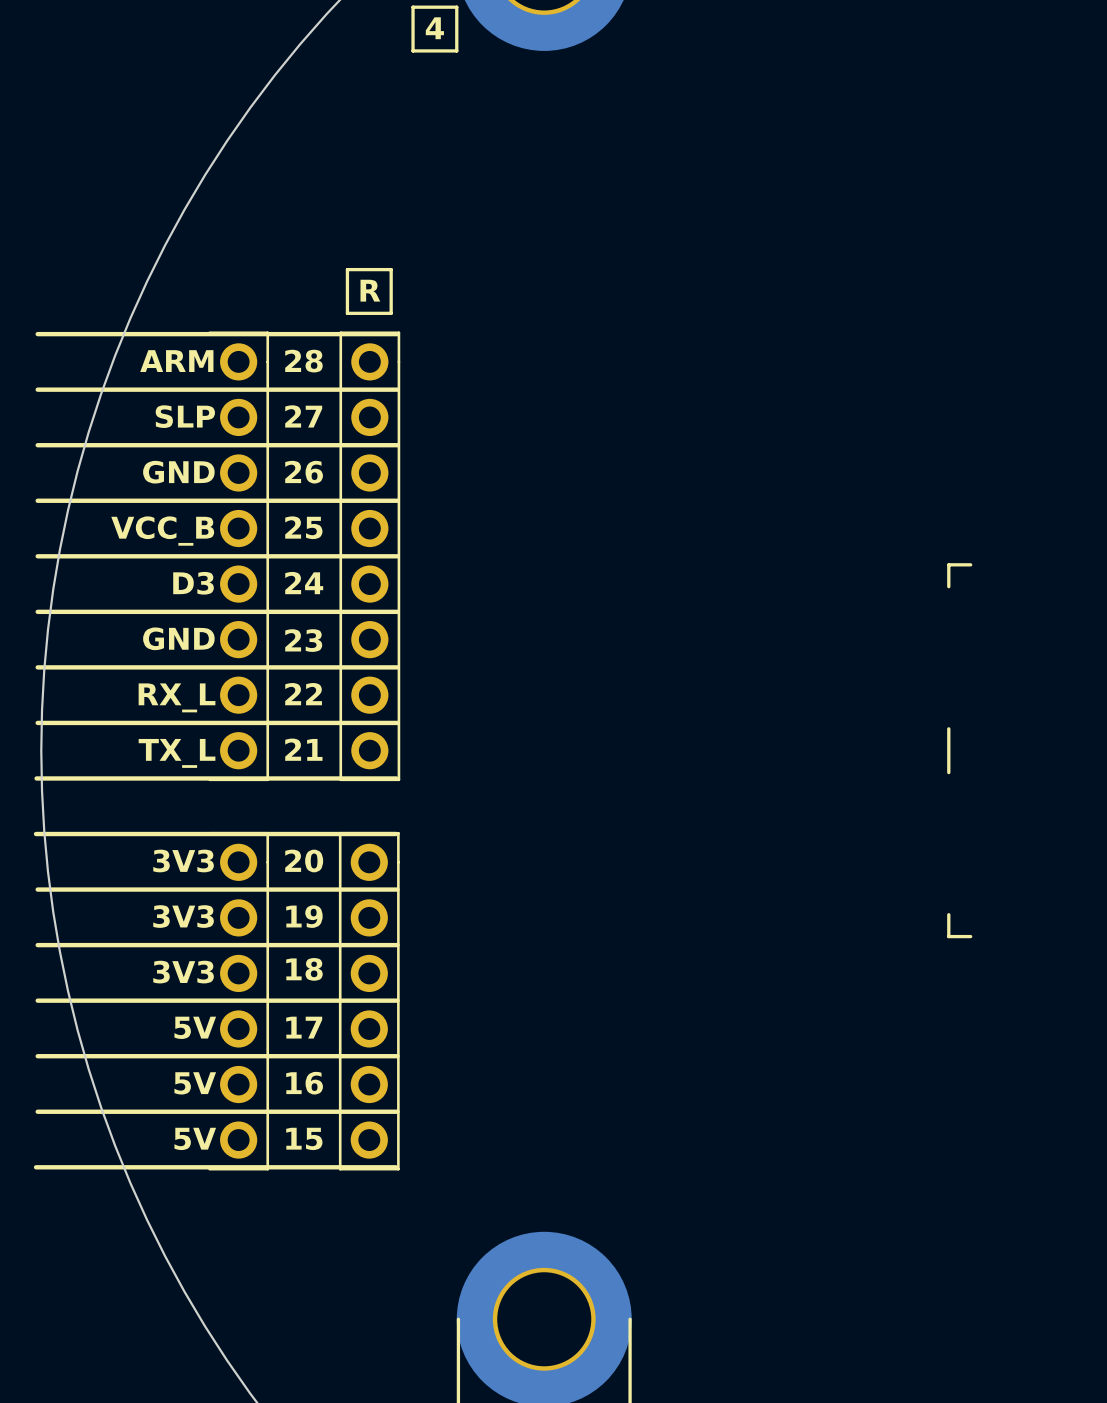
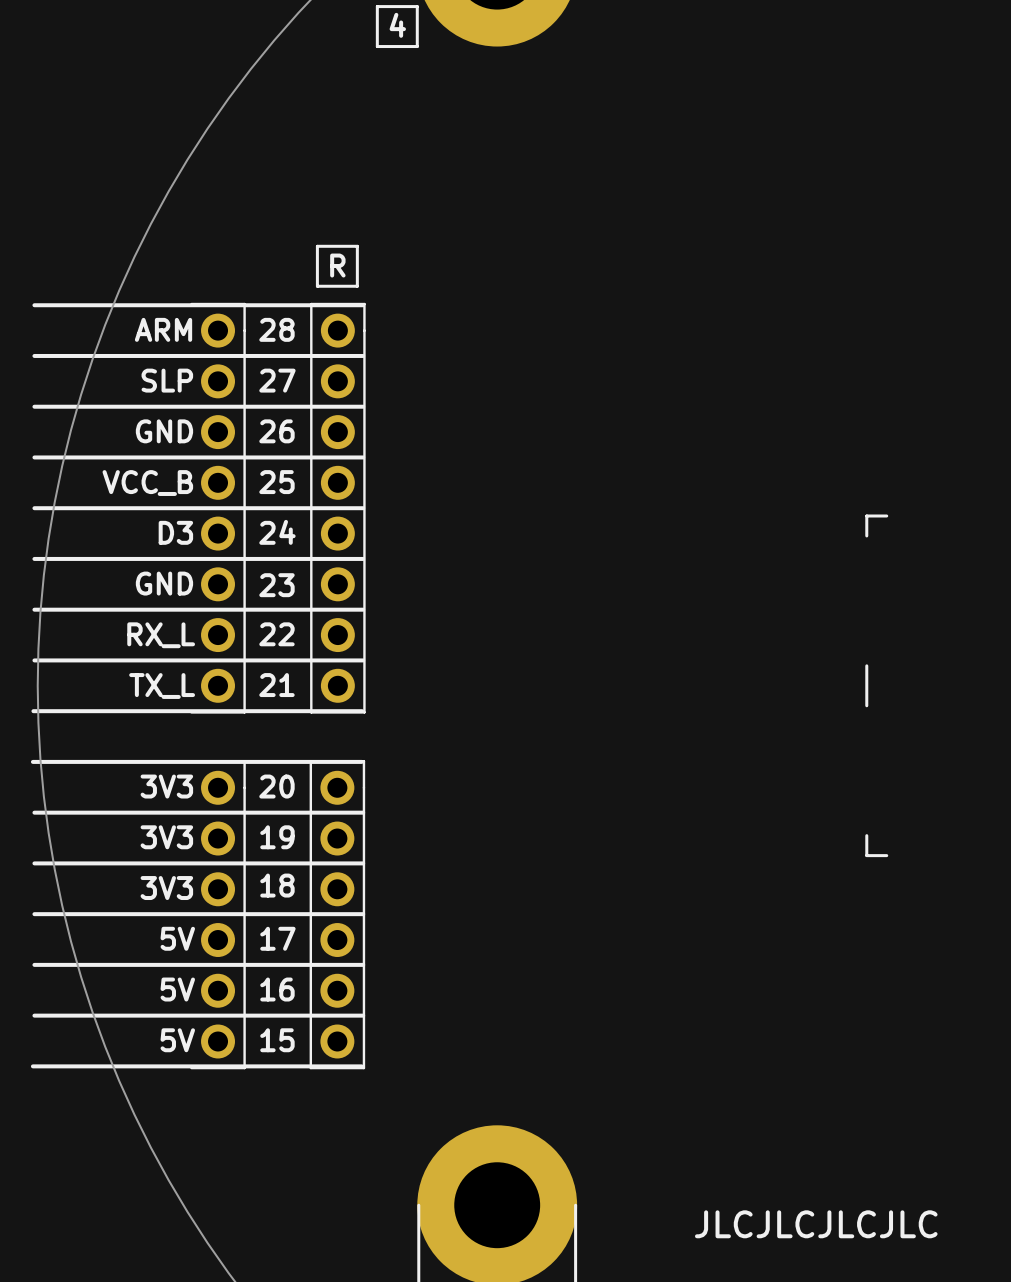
text: none -> JLCJLCJLCJLC (816, 1224)

